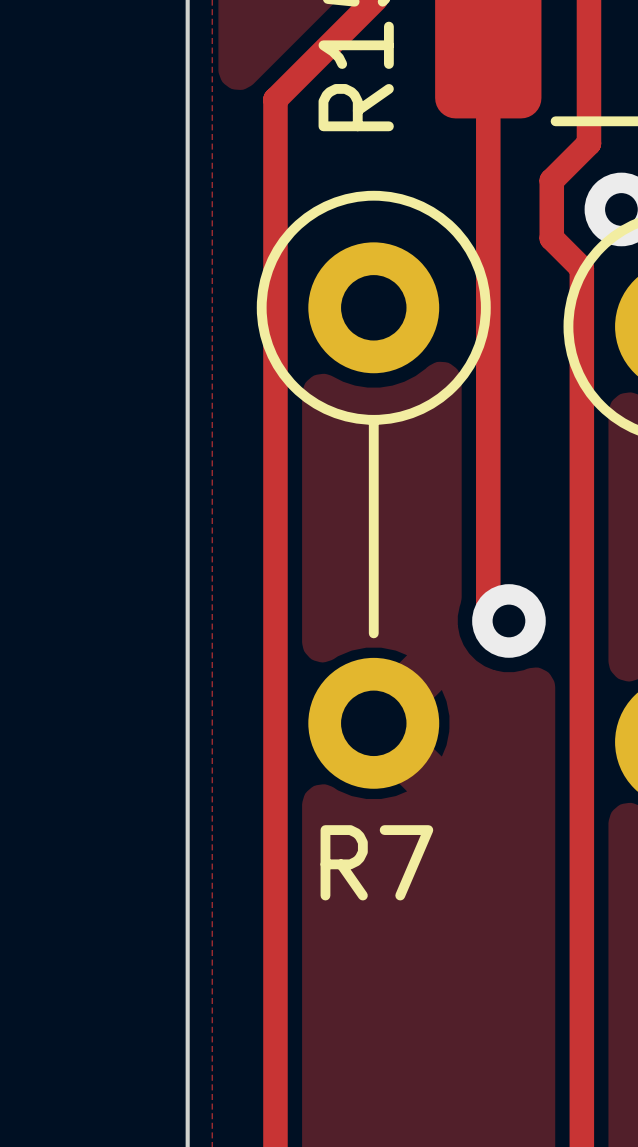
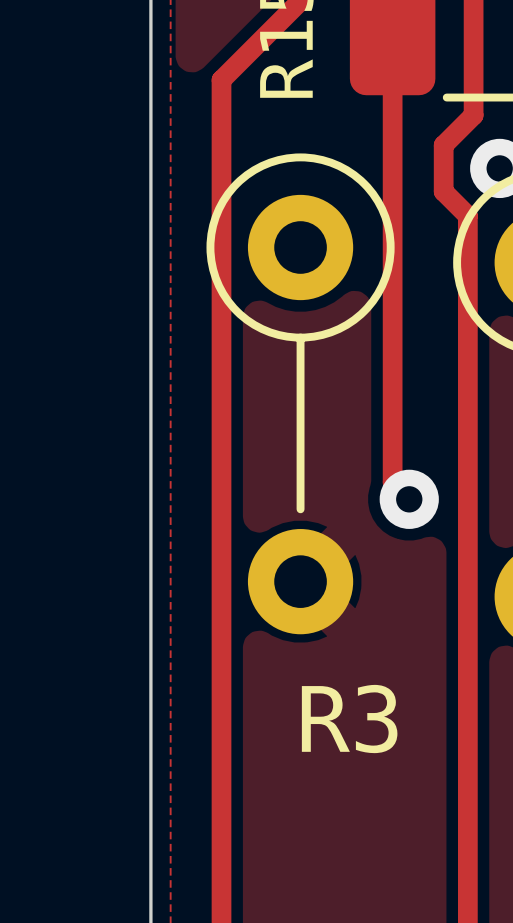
R7 name: R7 (376, 862) -> none
R3 name: none -> R3 (349, 719)

